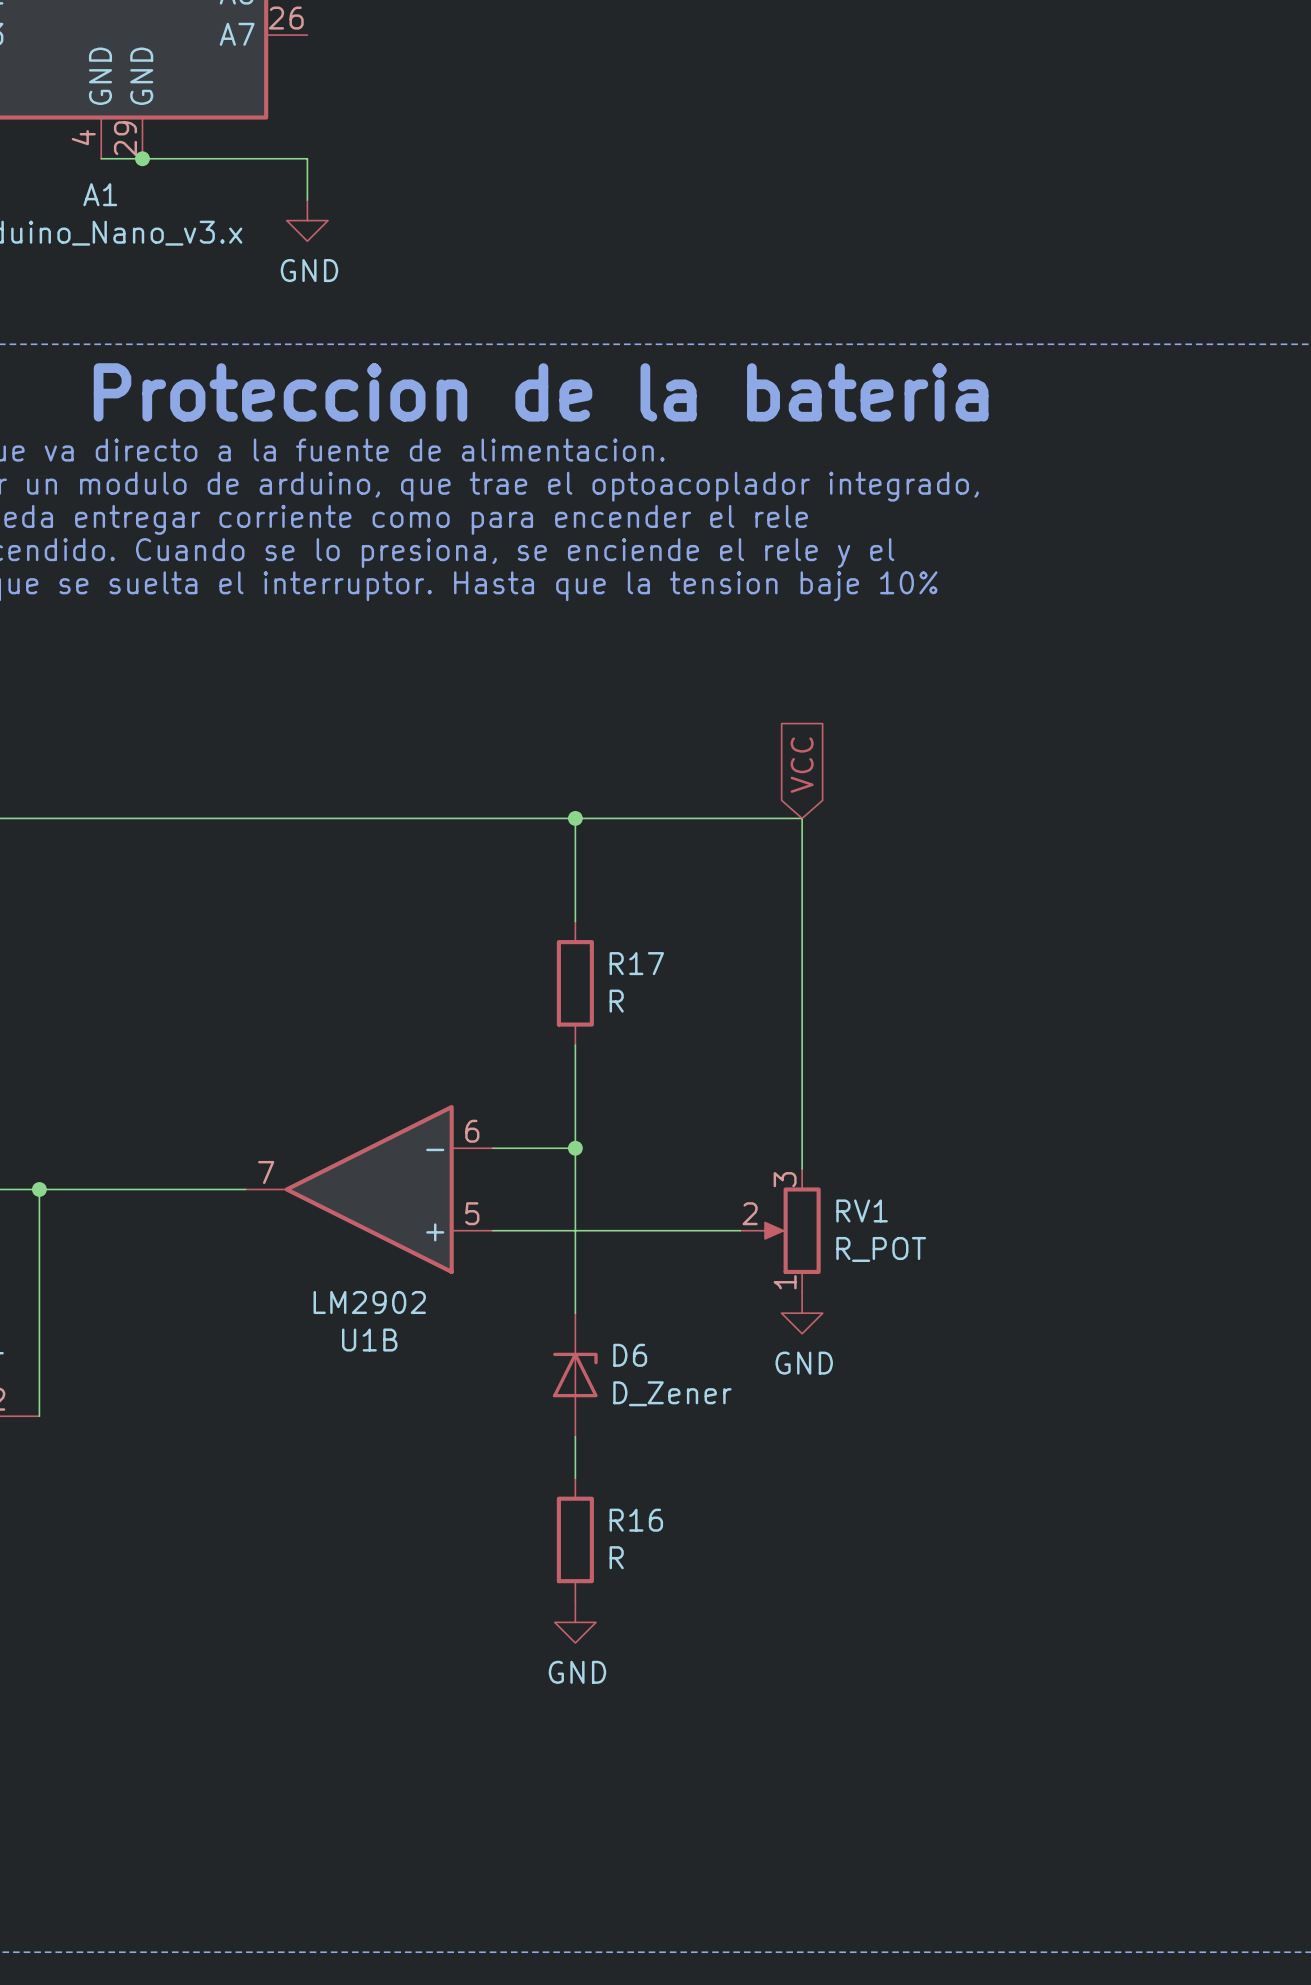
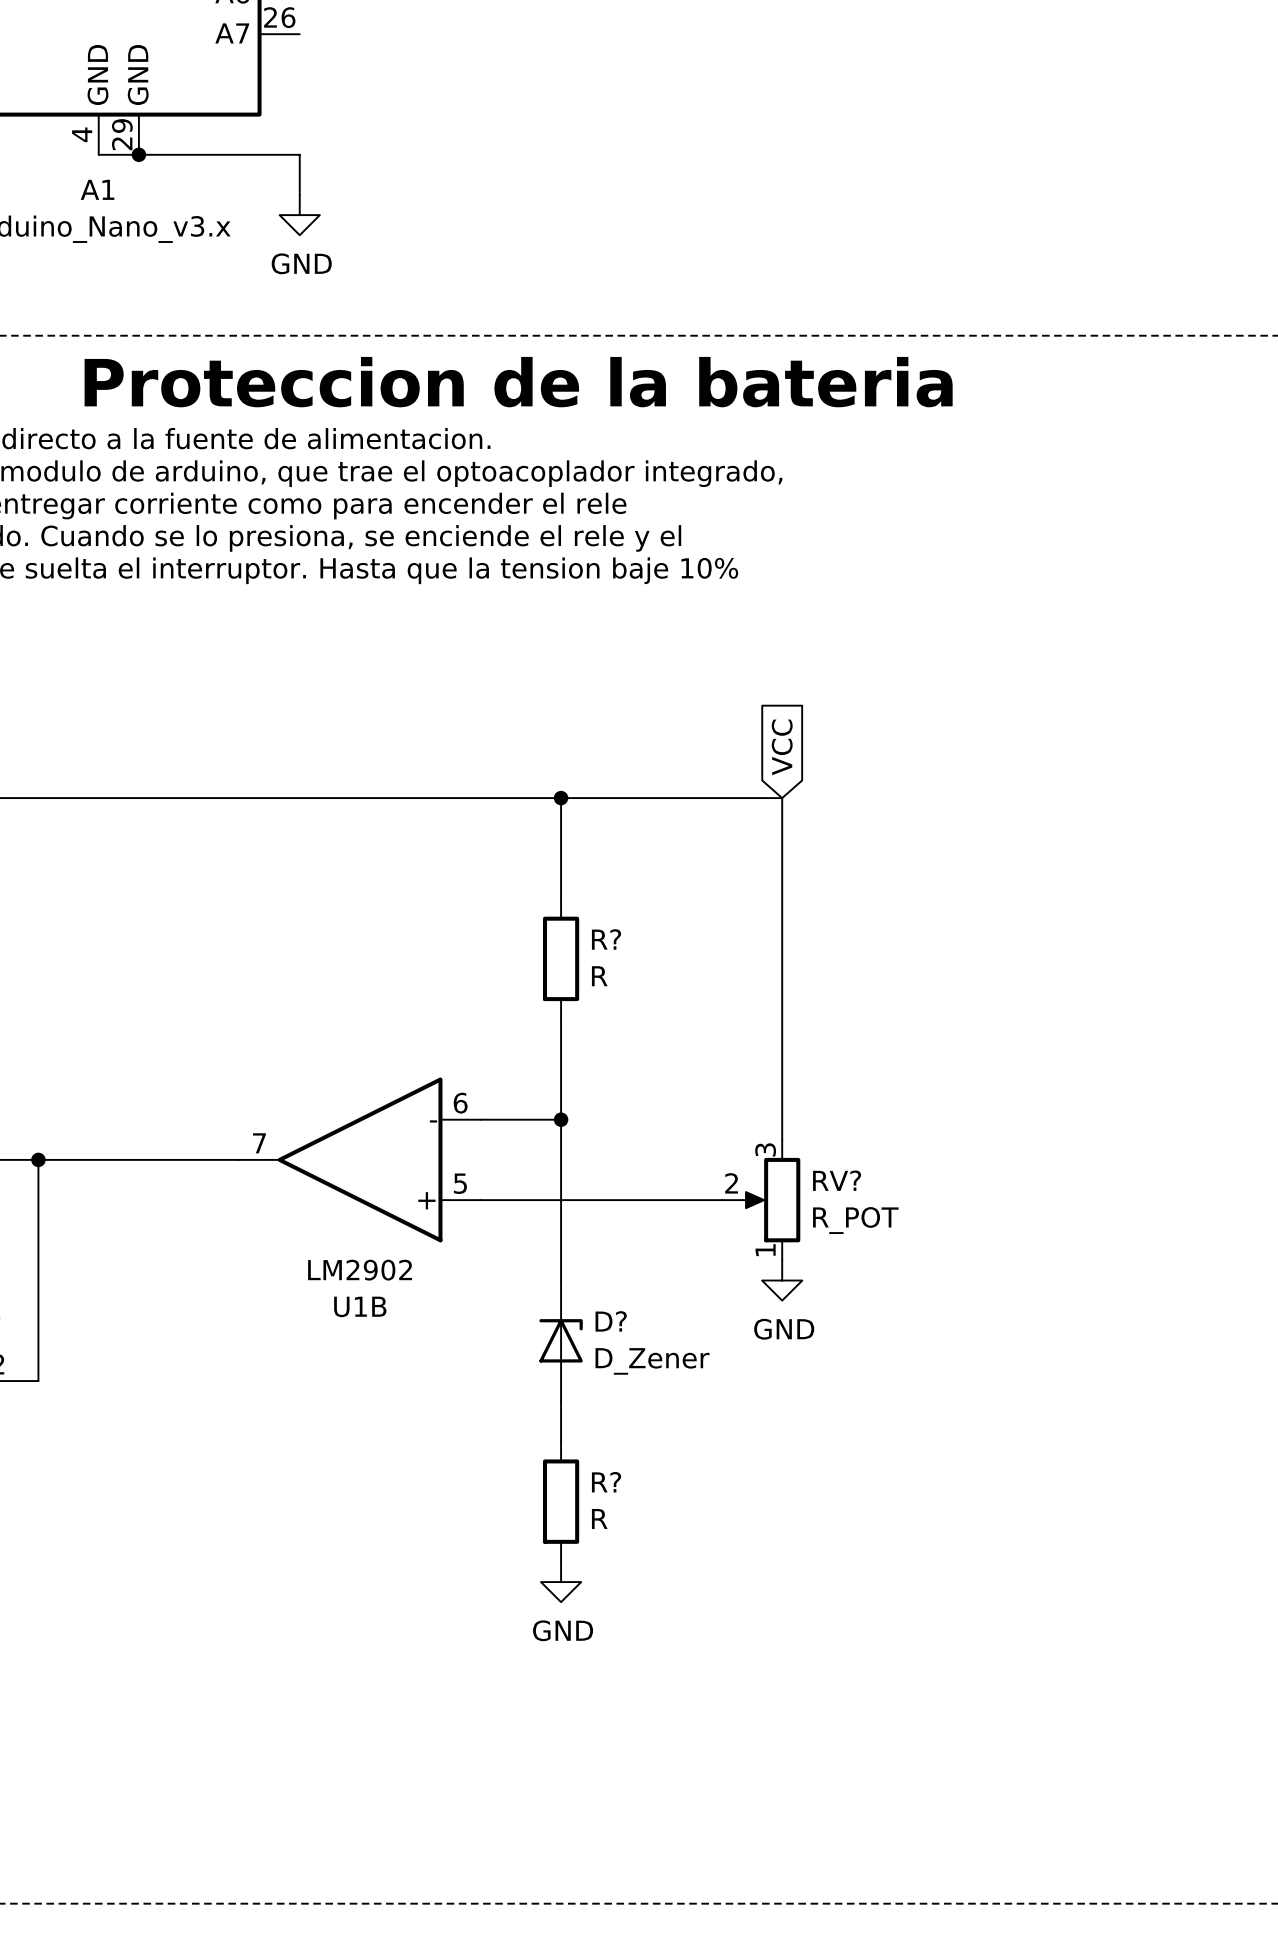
R17 name: R17 (636, 963) -> R? (606, 939)
RV1 name: RV1 (862, 1210) -> RV? (837, 1180)
D6 name: D6 (630, 1355) -> D? (611, 1321)
R16 name: R16 (636, 1520) -> R? (606, 1482)

